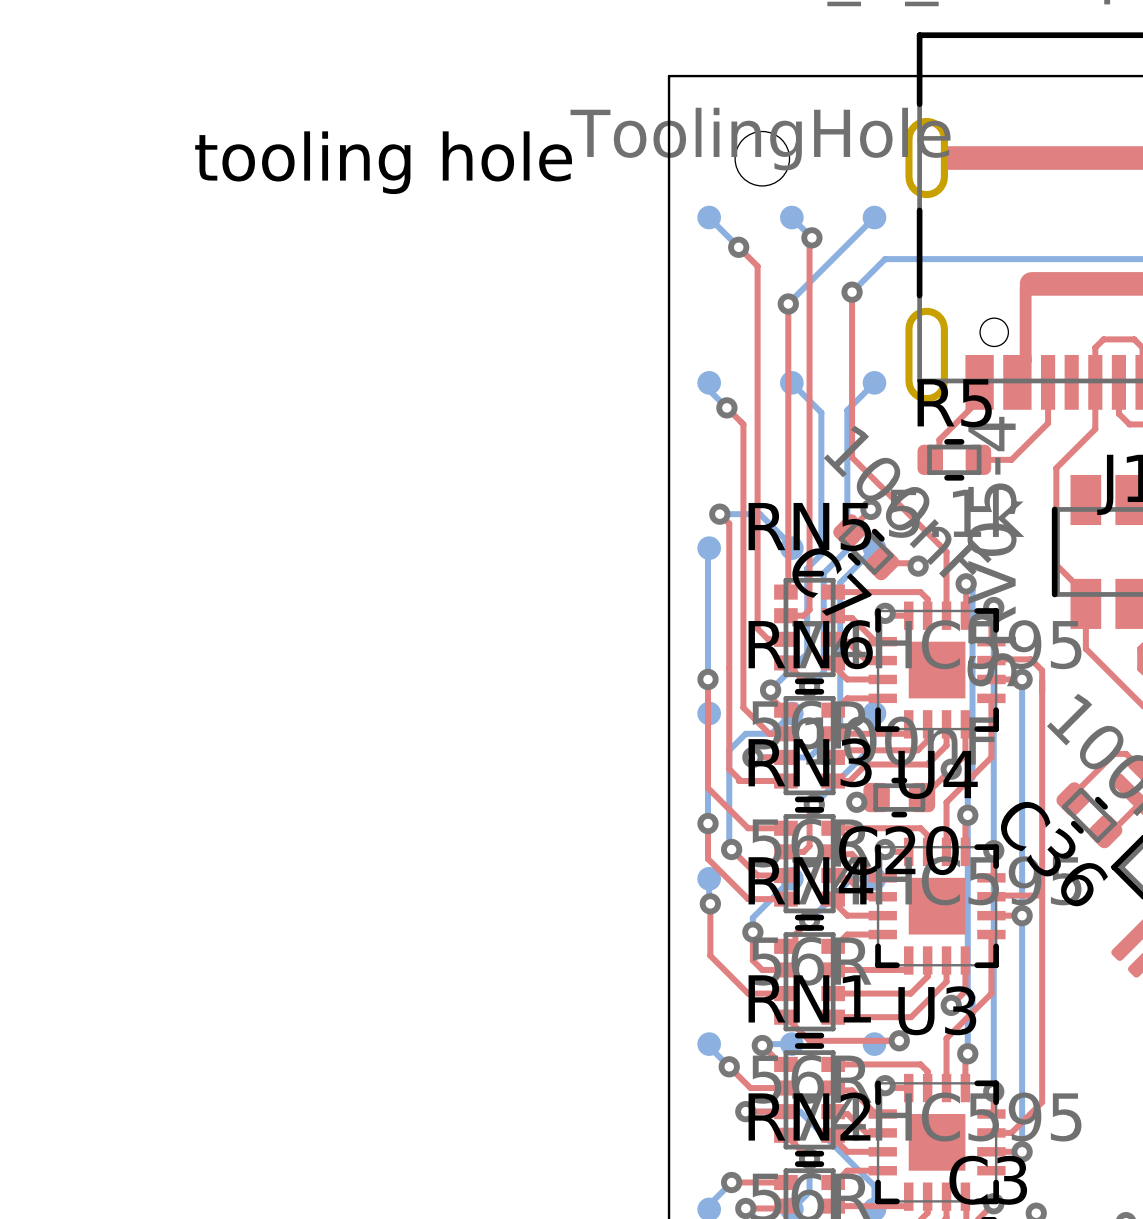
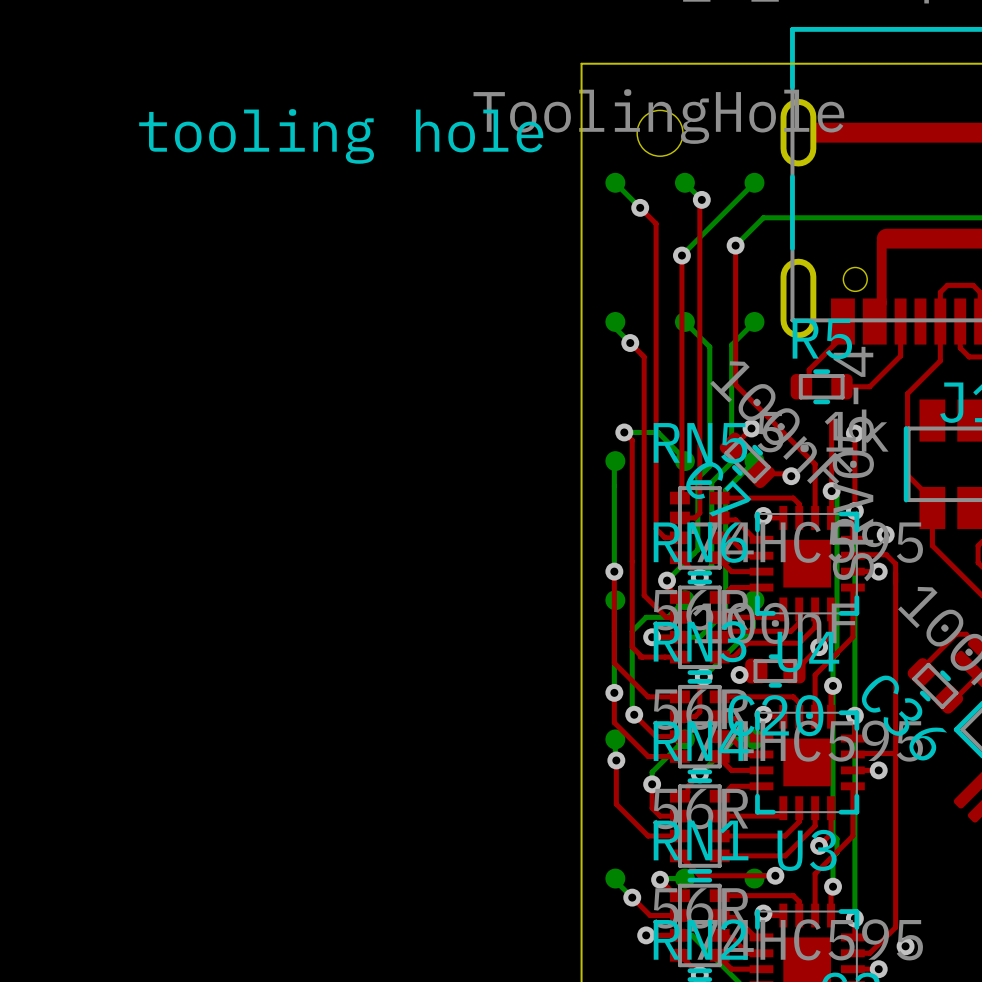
top track: none -> (831, 418) (831, 491)
top track: none -> (854, 433) (854, 510)
via: none -> (854, 433)
via: none -> (885, 534)
bottom track: (1022, 679) (1022, 1151) -> none
via: none -> (905, 946)

